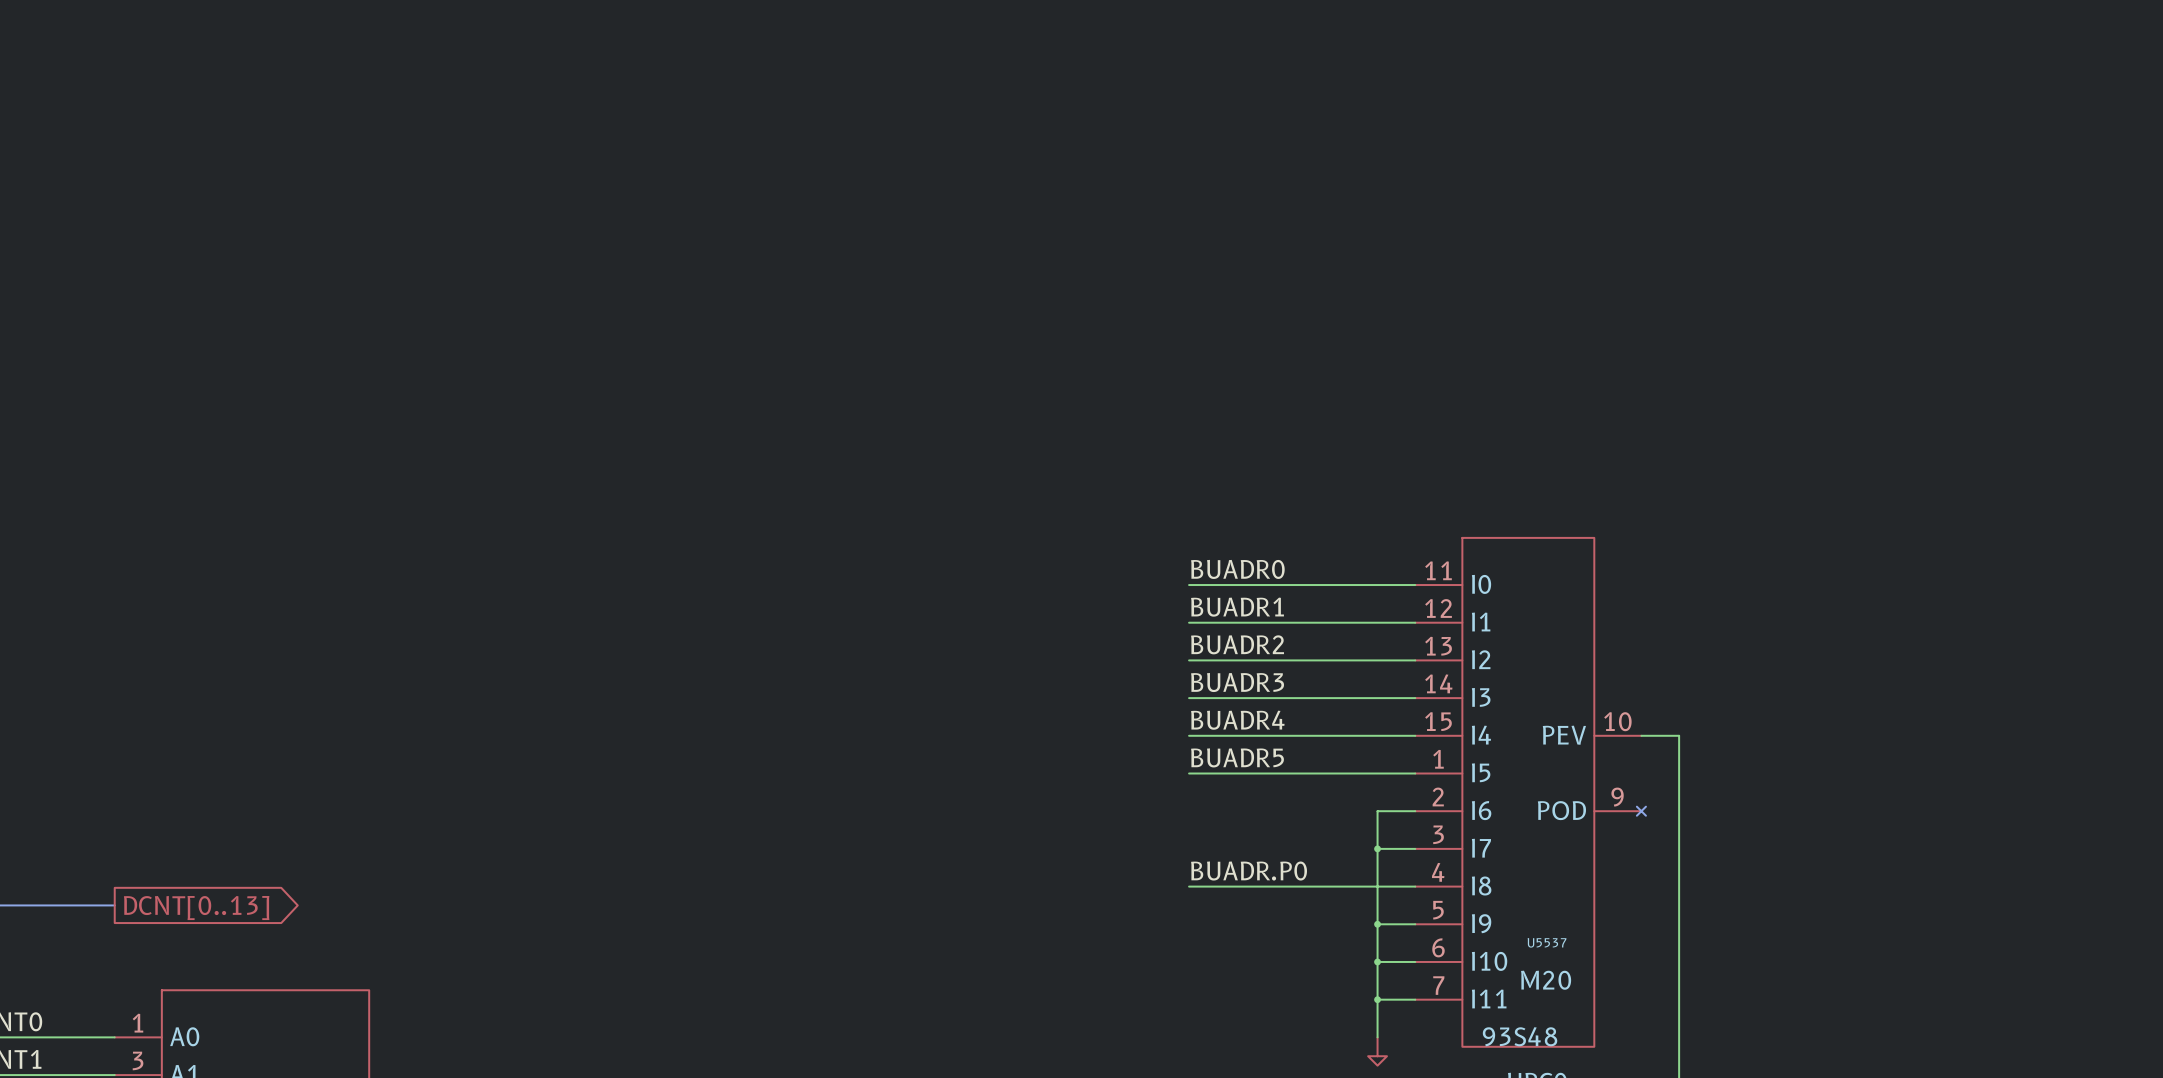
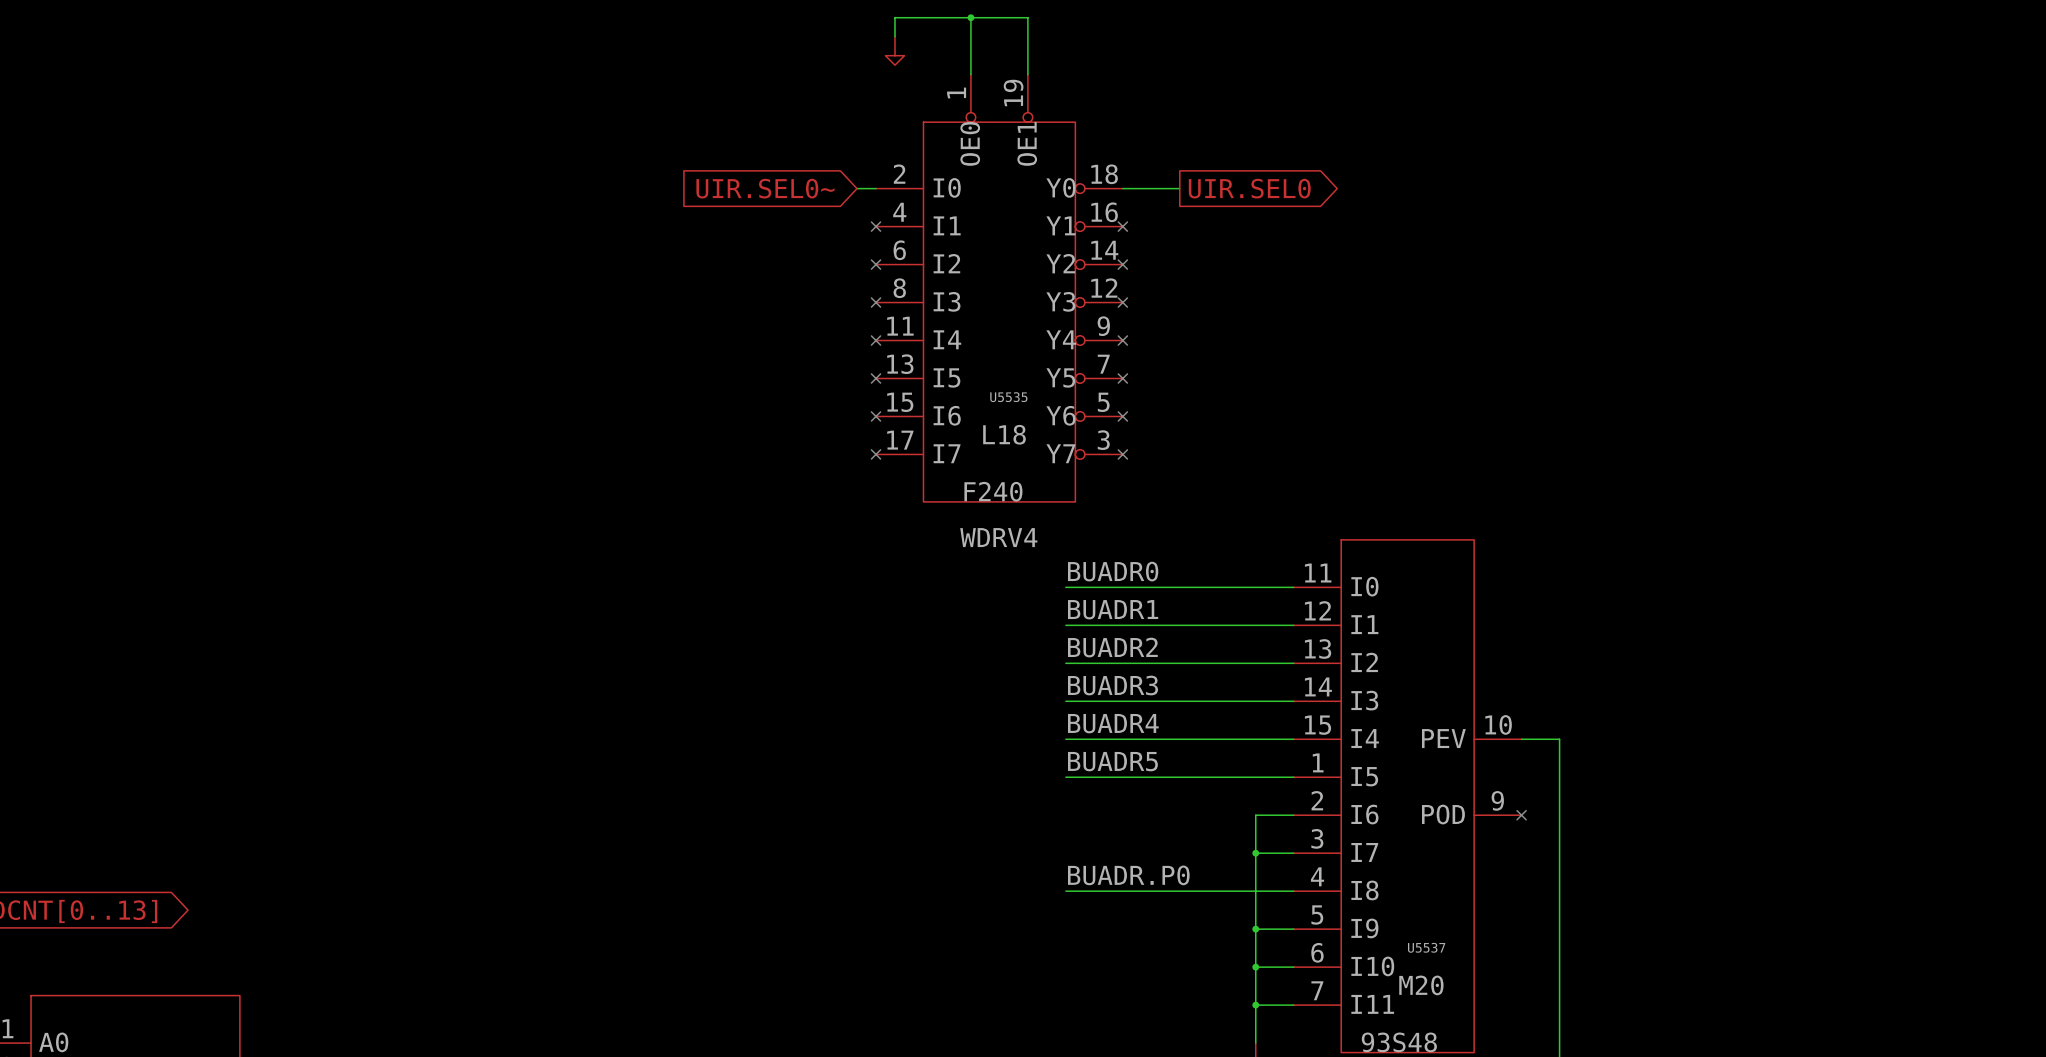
wire: none -> (970, 17) (970, 74)
junction: none -> (970, 17)
wire: none -> (894, 36) (894, 17) (1027, 17) (1027, 74)
power symbol: none -> (894, 51)
global label: none -> UIR.SEL0~ (765, 188)
wire: none -> (857, 188) (876, 188)
wire: none -> (1122, 188) (1179, 188)
global label: none -> UIR.SEL0 (1249, 188)
no-connect mark: none -> (876, 226)
no-connect mark: none -> (1122, 226)
no-connect mark: none -> (876, 264)
no-connect mark: none -> (1122, 264)
U5535: none -> F240 (999, 288)
no-connect mark: none -> (876, 302)
no-connect mark: none -> (1122, 302)
no-connect mark: none -> (876, 340)
no-connect mark: none -> (1122, 340)
no-connect mark: none -> (876, 378)
no-connect mark: none -> (1122, 378)
no-connect mark: none -> (876, 416)
no-connect mark: none -> (1122, 416)
no-connect mark: none -> (876, 454)
no-connect mark: none -> (1122, 454)

